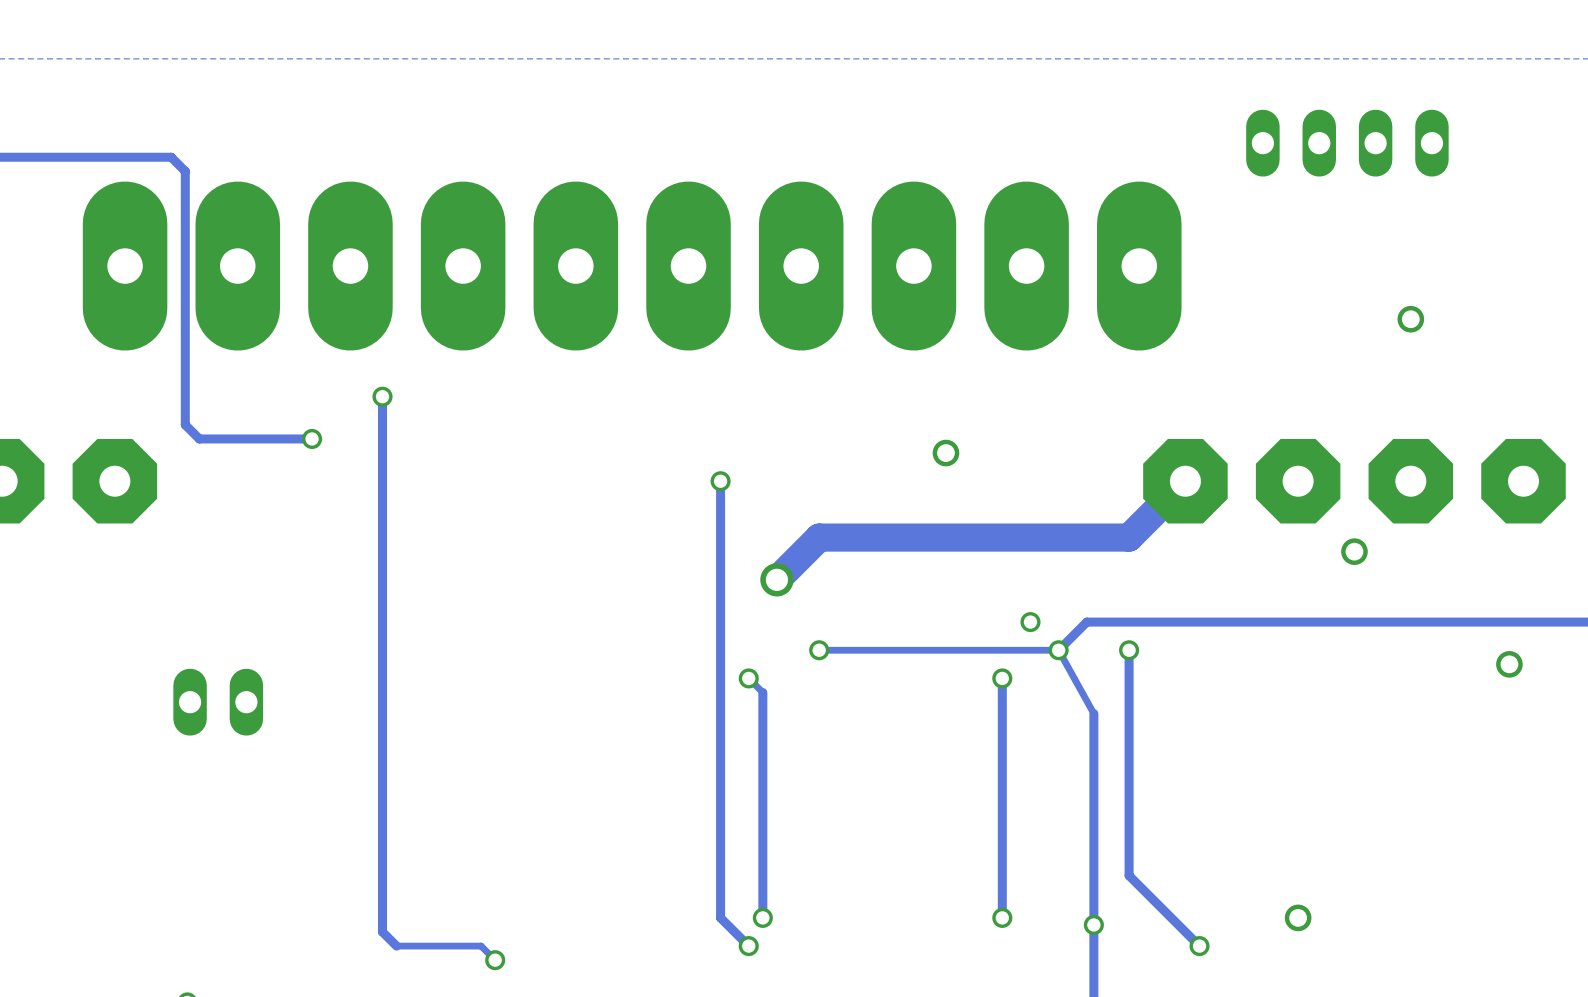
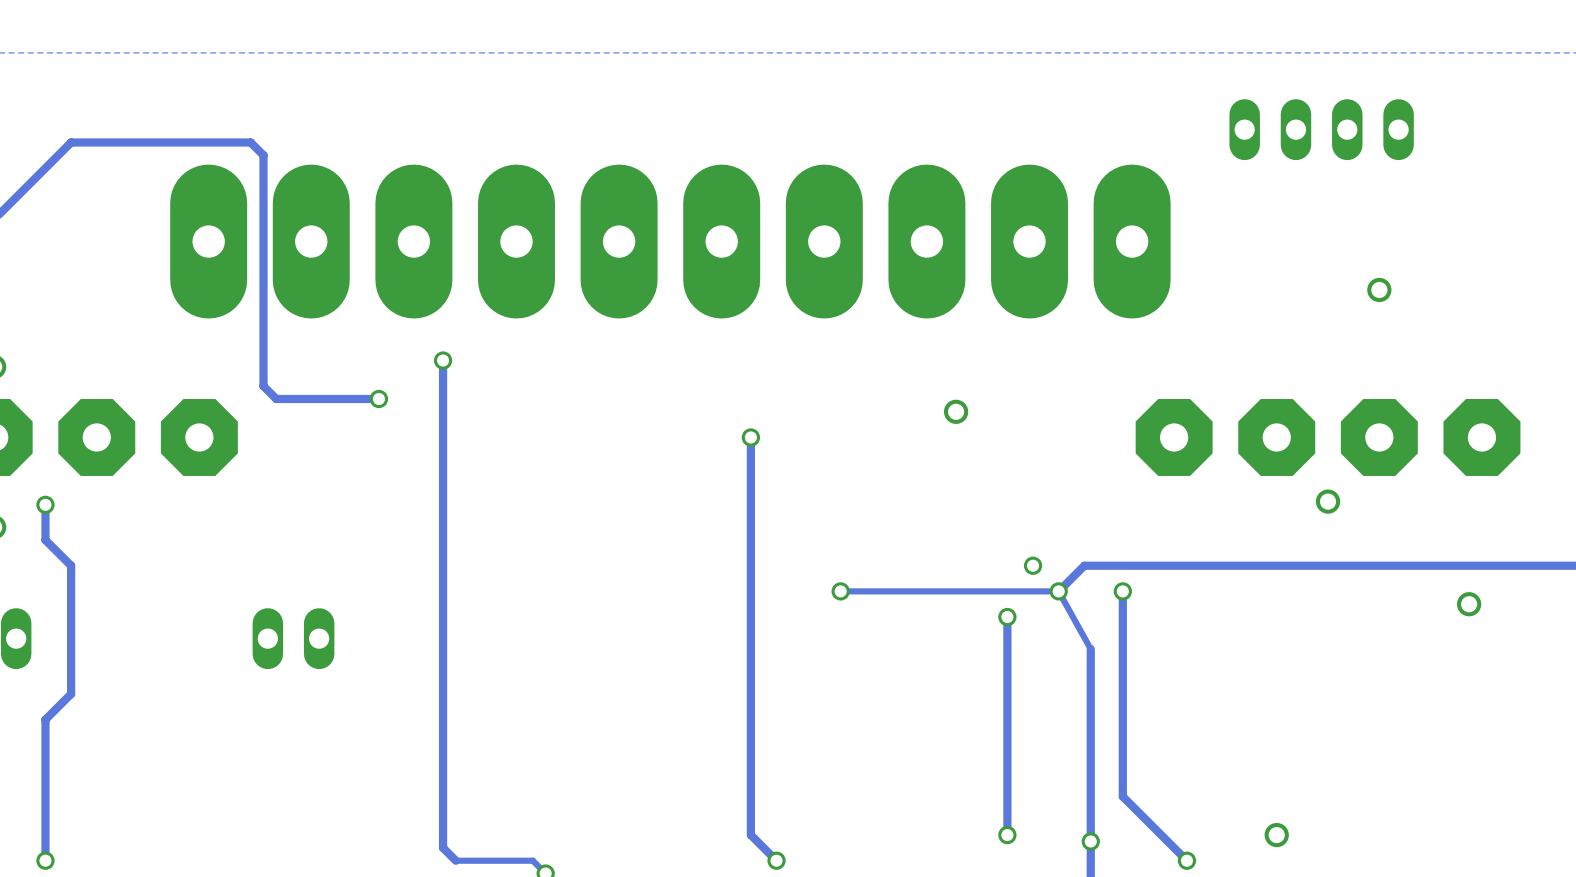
track: (1185, 481) (1129, 537) (819, 537) (776, 579) -> none
via: (776, 579) -> none
track: (748, 678) (762, 692) (762, 917) -> none
via: (748, 678) -> none
via: (762, 917) -> none

